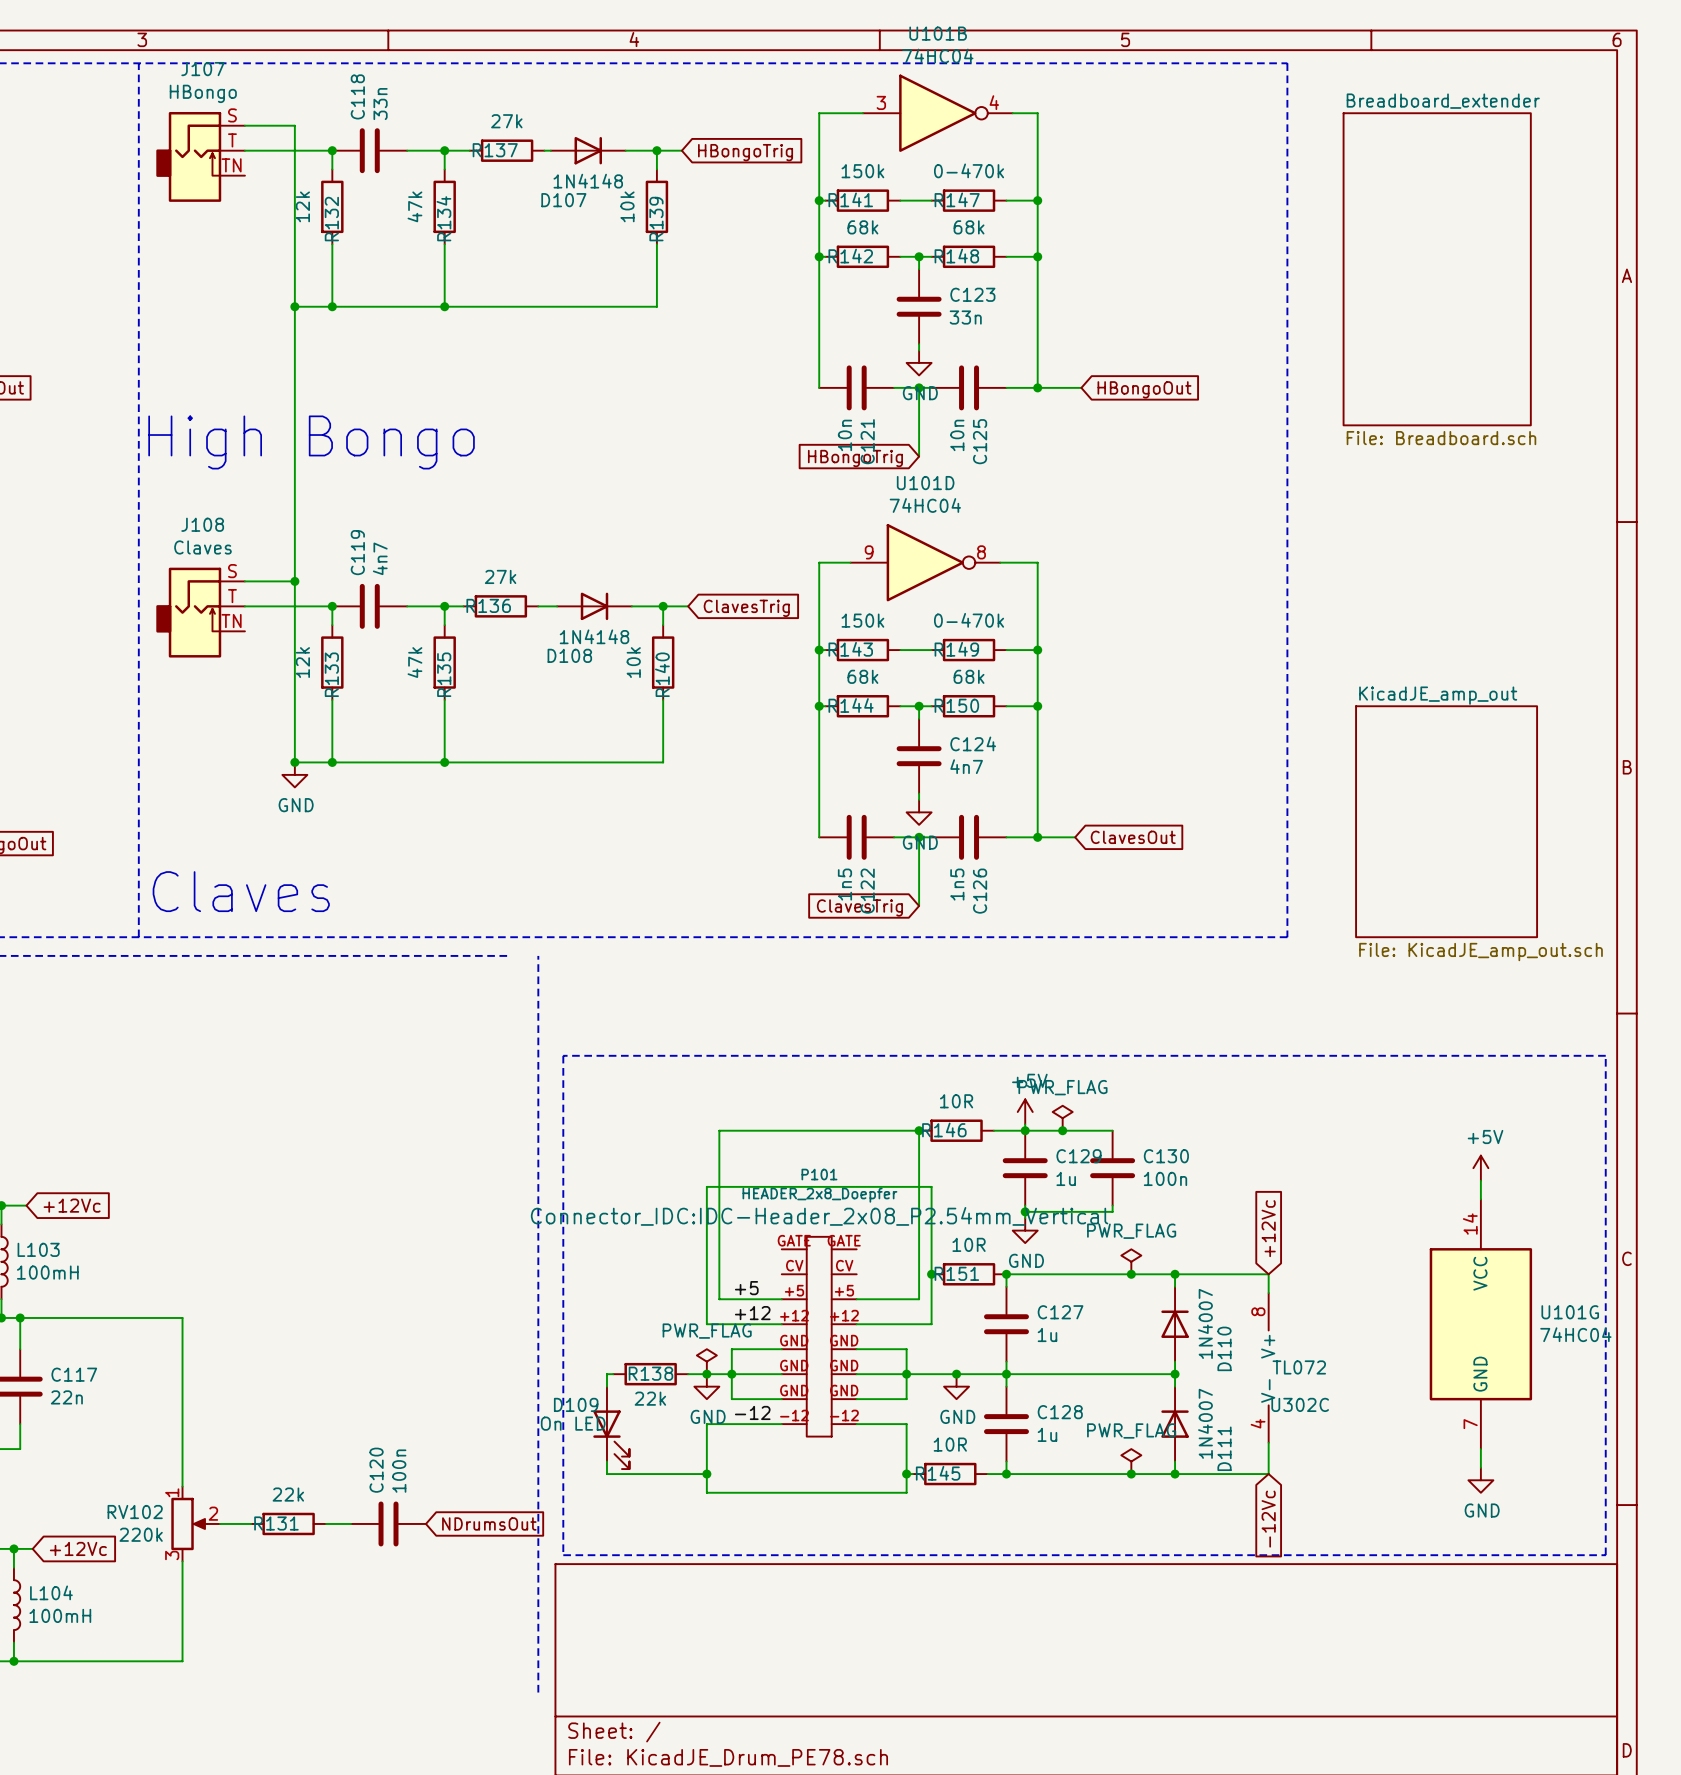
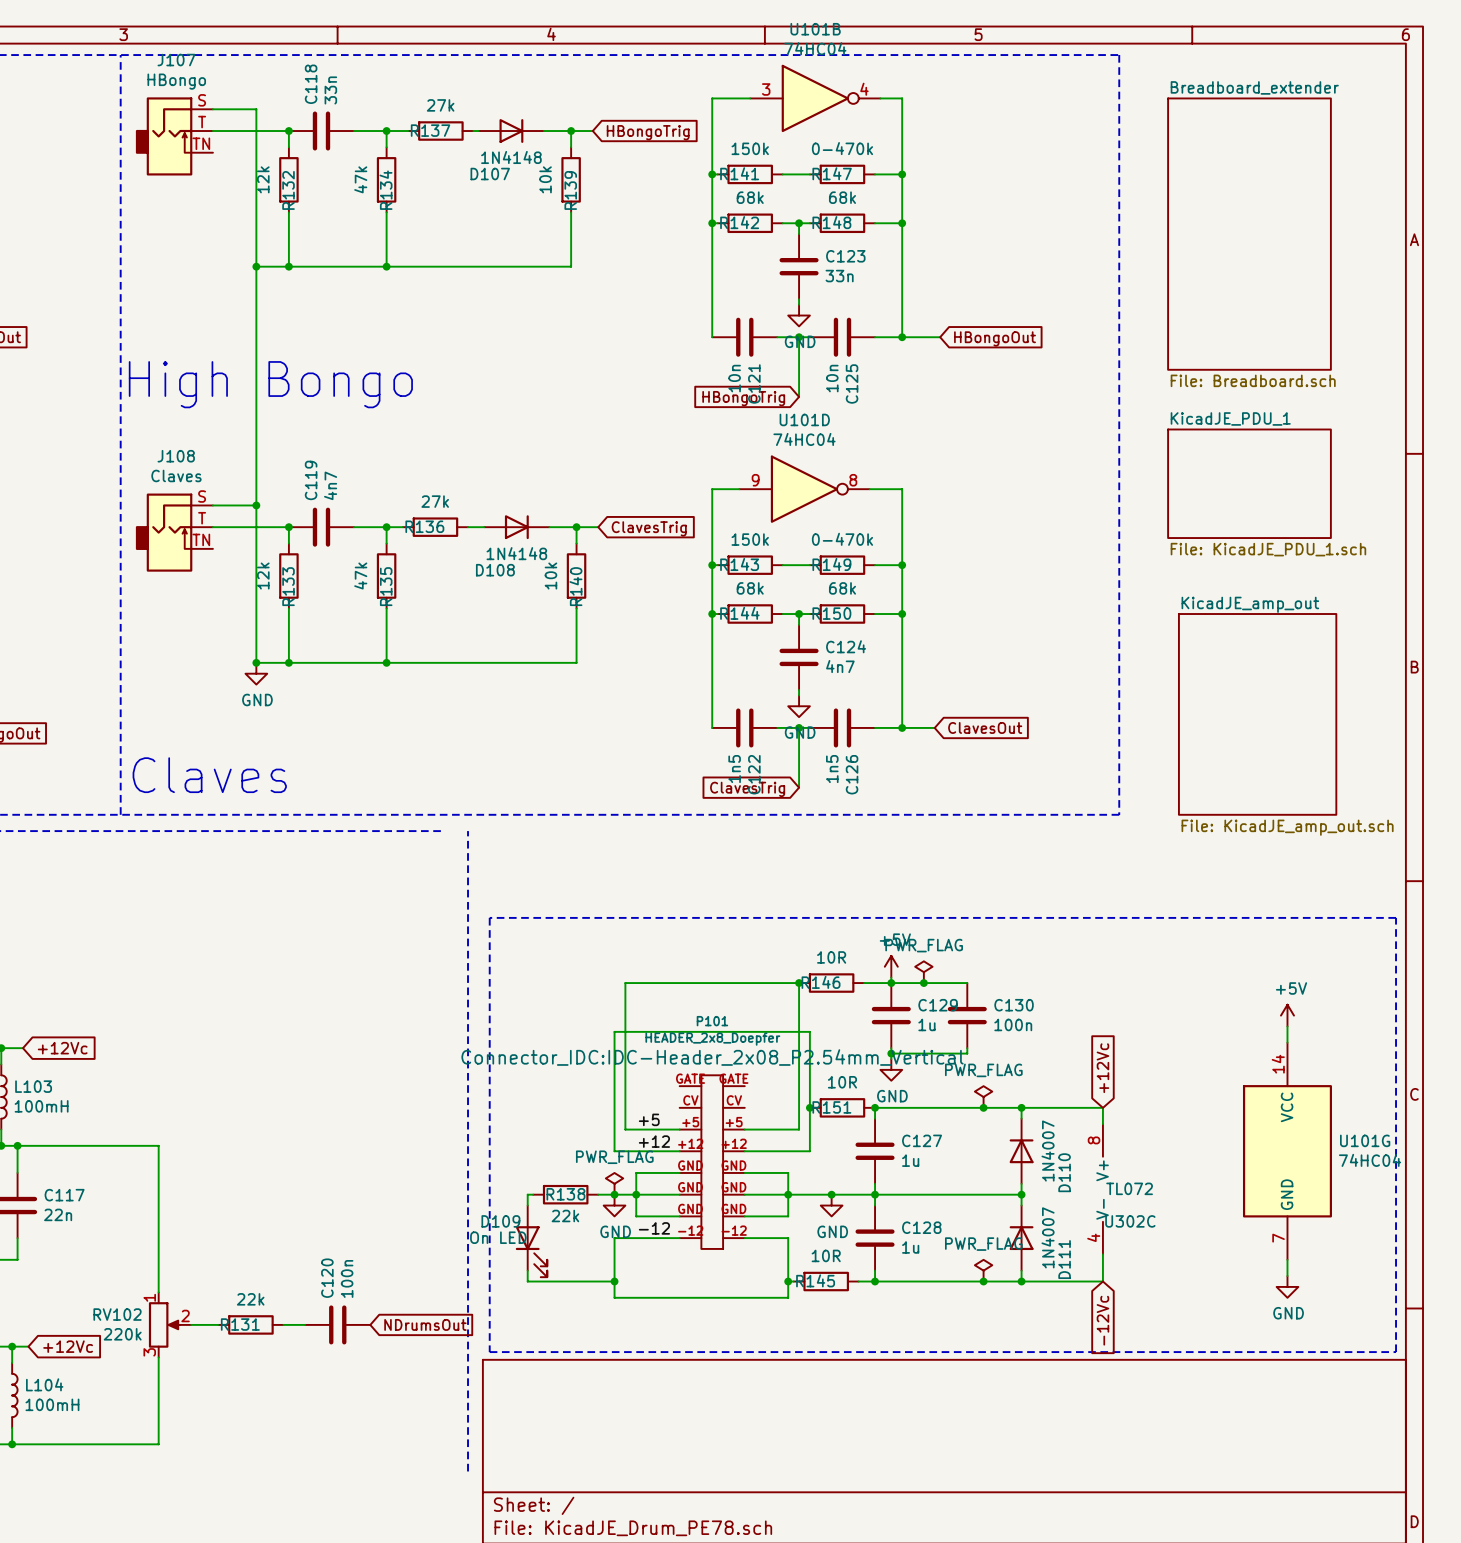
sheet KicadJE_PDU_1: none -> File: KicadJE_PDU_1.sch (1249, 483)

